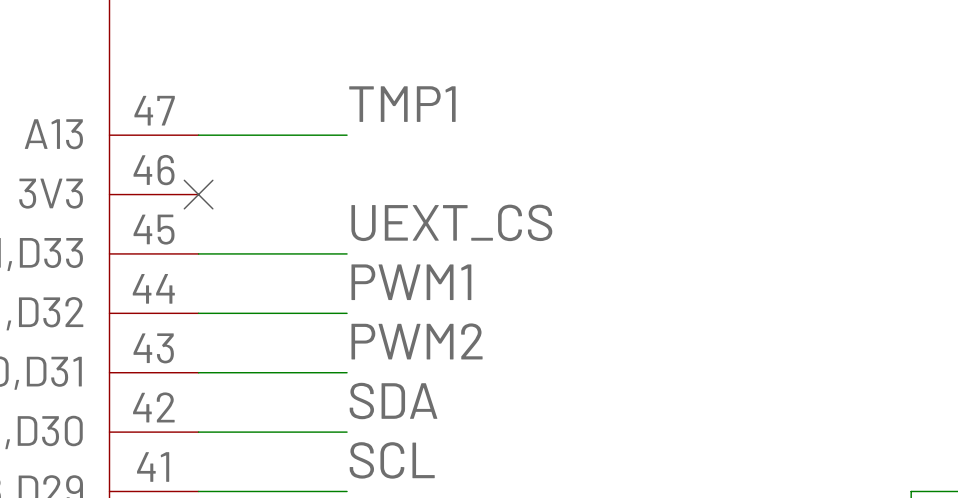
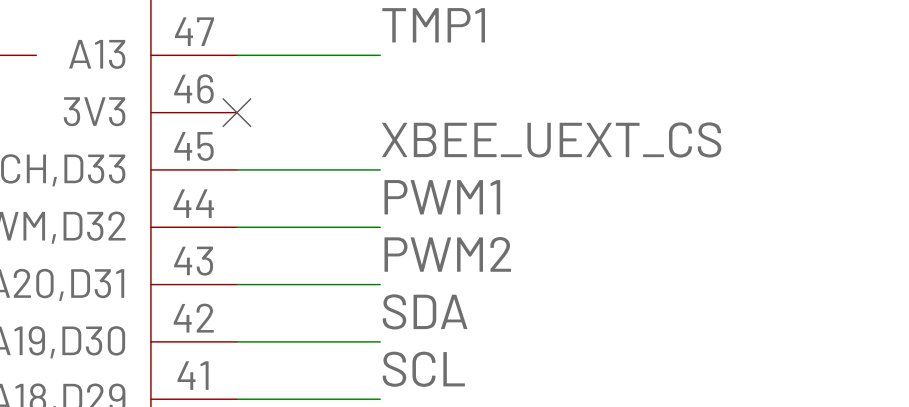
label: UEXT_CS (451, 222) -> XBEE_UEXT_CS (551, 139)

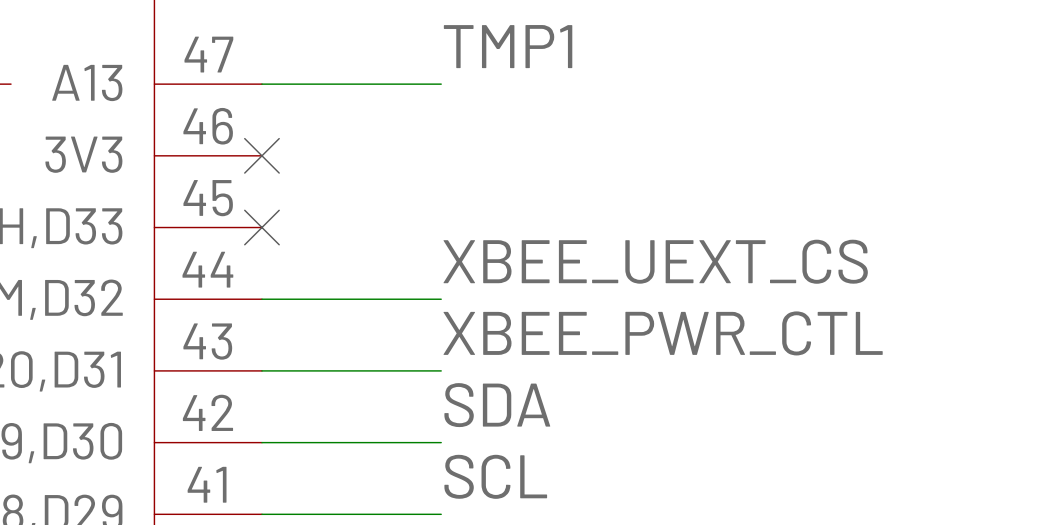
label: XBEE_UEXT_CS (551, 139) -> none
wire: (236, 169) (380, 169) -> none
no-connect mark: none -> (261, 227)
label: PWM1 (442, 197) -> XBEE_UEXT_CS (655, 261)
label: PWM2 (447, 254) -> XBEE_PWR_CTL (663, 333)

